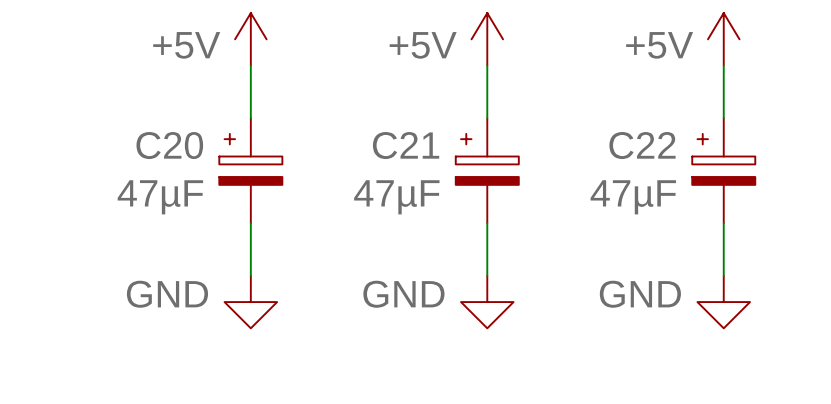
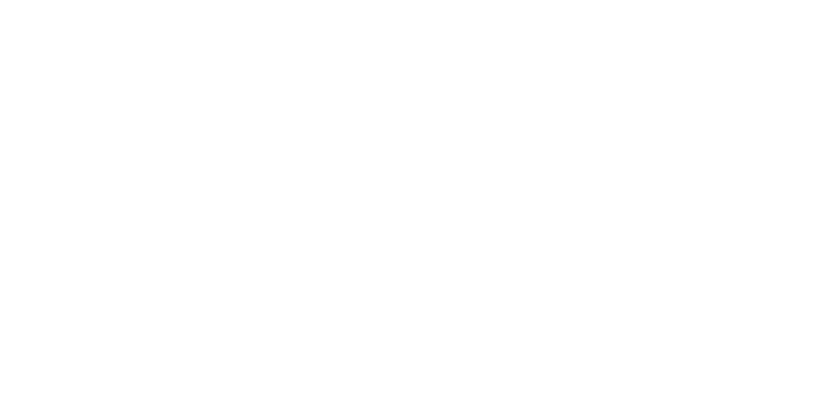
power symbol: +5V (250, 39) -> none
power symbol: +5V (487, 39) -> none
power symbol: +5V (723, 39) -> none
wire: (250, 65) (250, 118) -> none
wire: (487, 65) (487, 118) -> none
wire: (723, 65) (723, 118) -> none
C20: 47µF (250, 170) -> none
C21: 47µF (487, 170) -> none
C22: 47µF (723, 170) -> none
wire: (250, 223) (250, 275) -> none
wire: (487, 223) (487, 275) -> none
wire: (723, 223) (723, 275) -> none
power symbol: GND (250, 302) -> none
power symbol: GND (487, 302) -> none
power symbol: GND (723, 302) -> none

